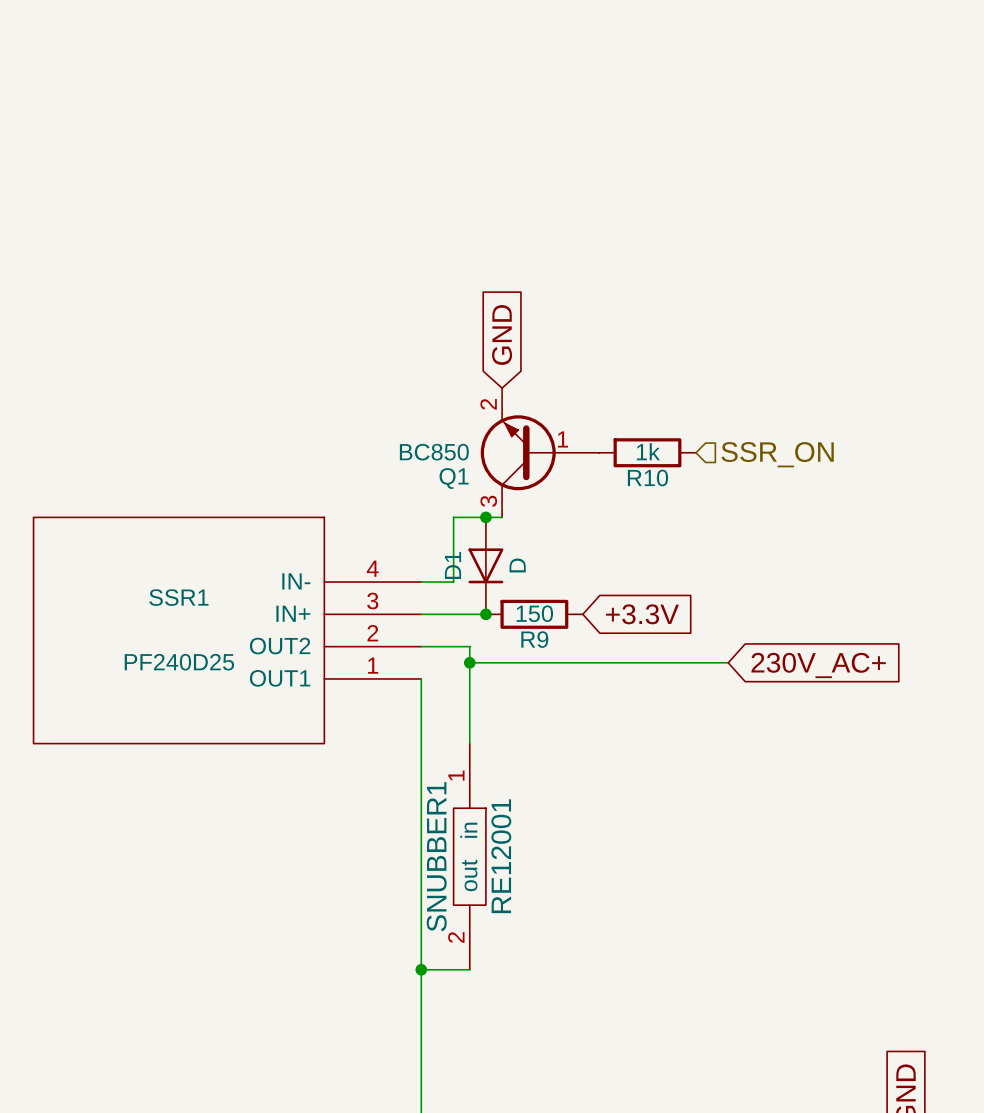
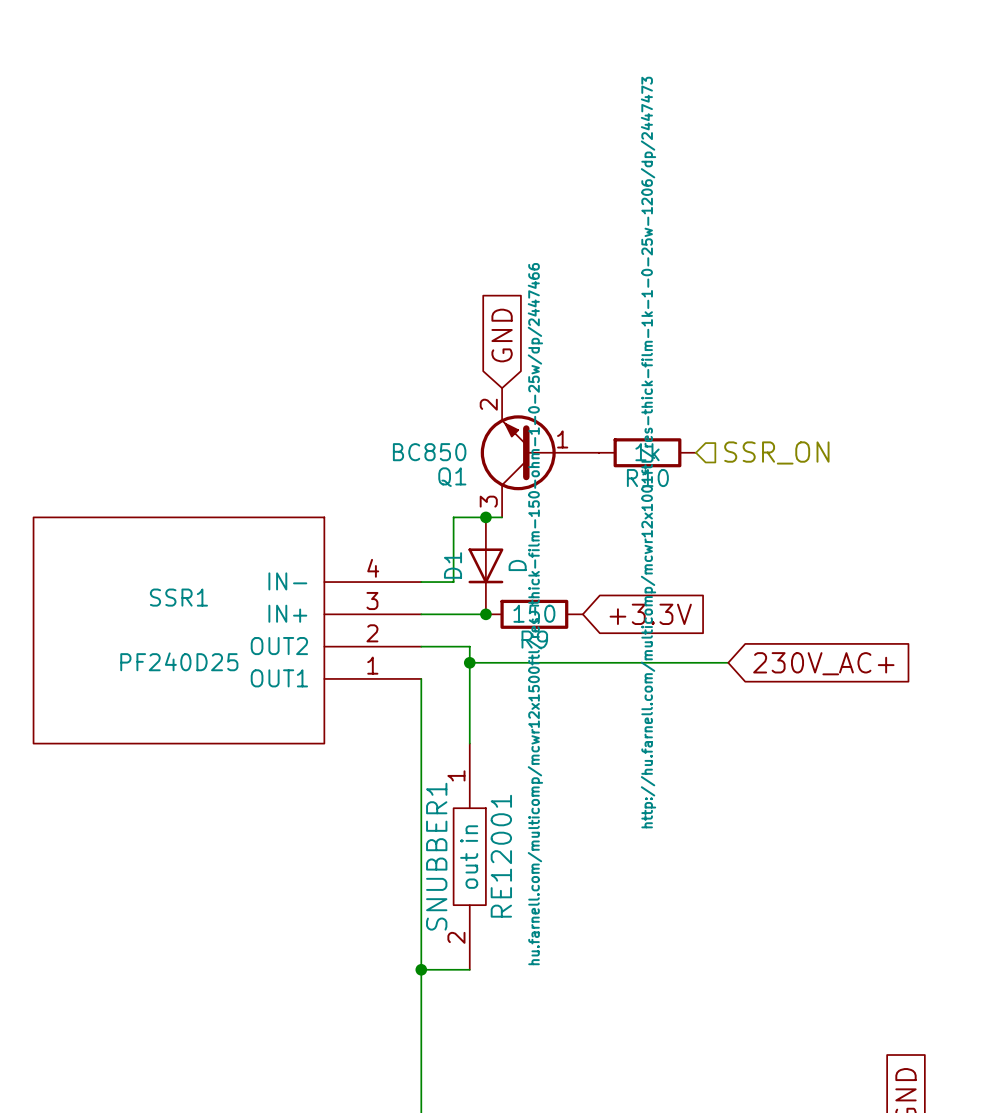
R10 text: none -> http://hu.farnell.com/multicomp/mcwr12x1001ftl/res-thick-film-1k-1-0-25w-1206/dp/2447473 (648, 452)
R9 text: none -> hu.farnell.com/multicomp/mcwr12x1500ftl/res-thick-film-150-ohm-1-0-25w/dp/2447466 (535, 614)

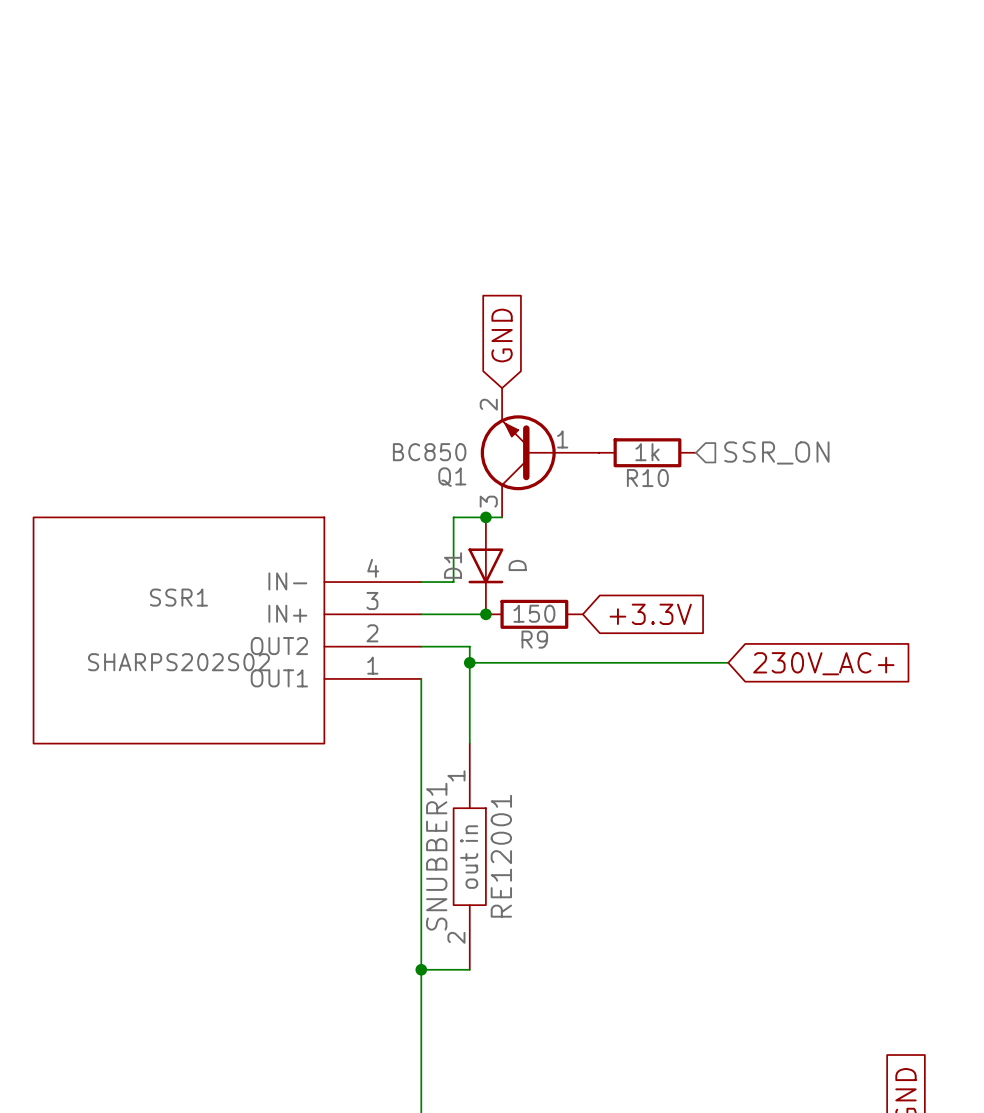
R10 text: http://hu.farnell.com/multicomp/mcwr12x1001ftl/res-thick-film-1k-1-0-25w-1206/dp/2447473 (648, 452) -> none
R9 text: hu.farnell.com/multicomp/mcwr12x1500ftl/res-thick-film-150-ohm-1-0-25w/dp/2447466 (535, 614) -> none
SSR1 value: PF240D25 (179, 661) -> SHARPS202S02 (178, 662)

